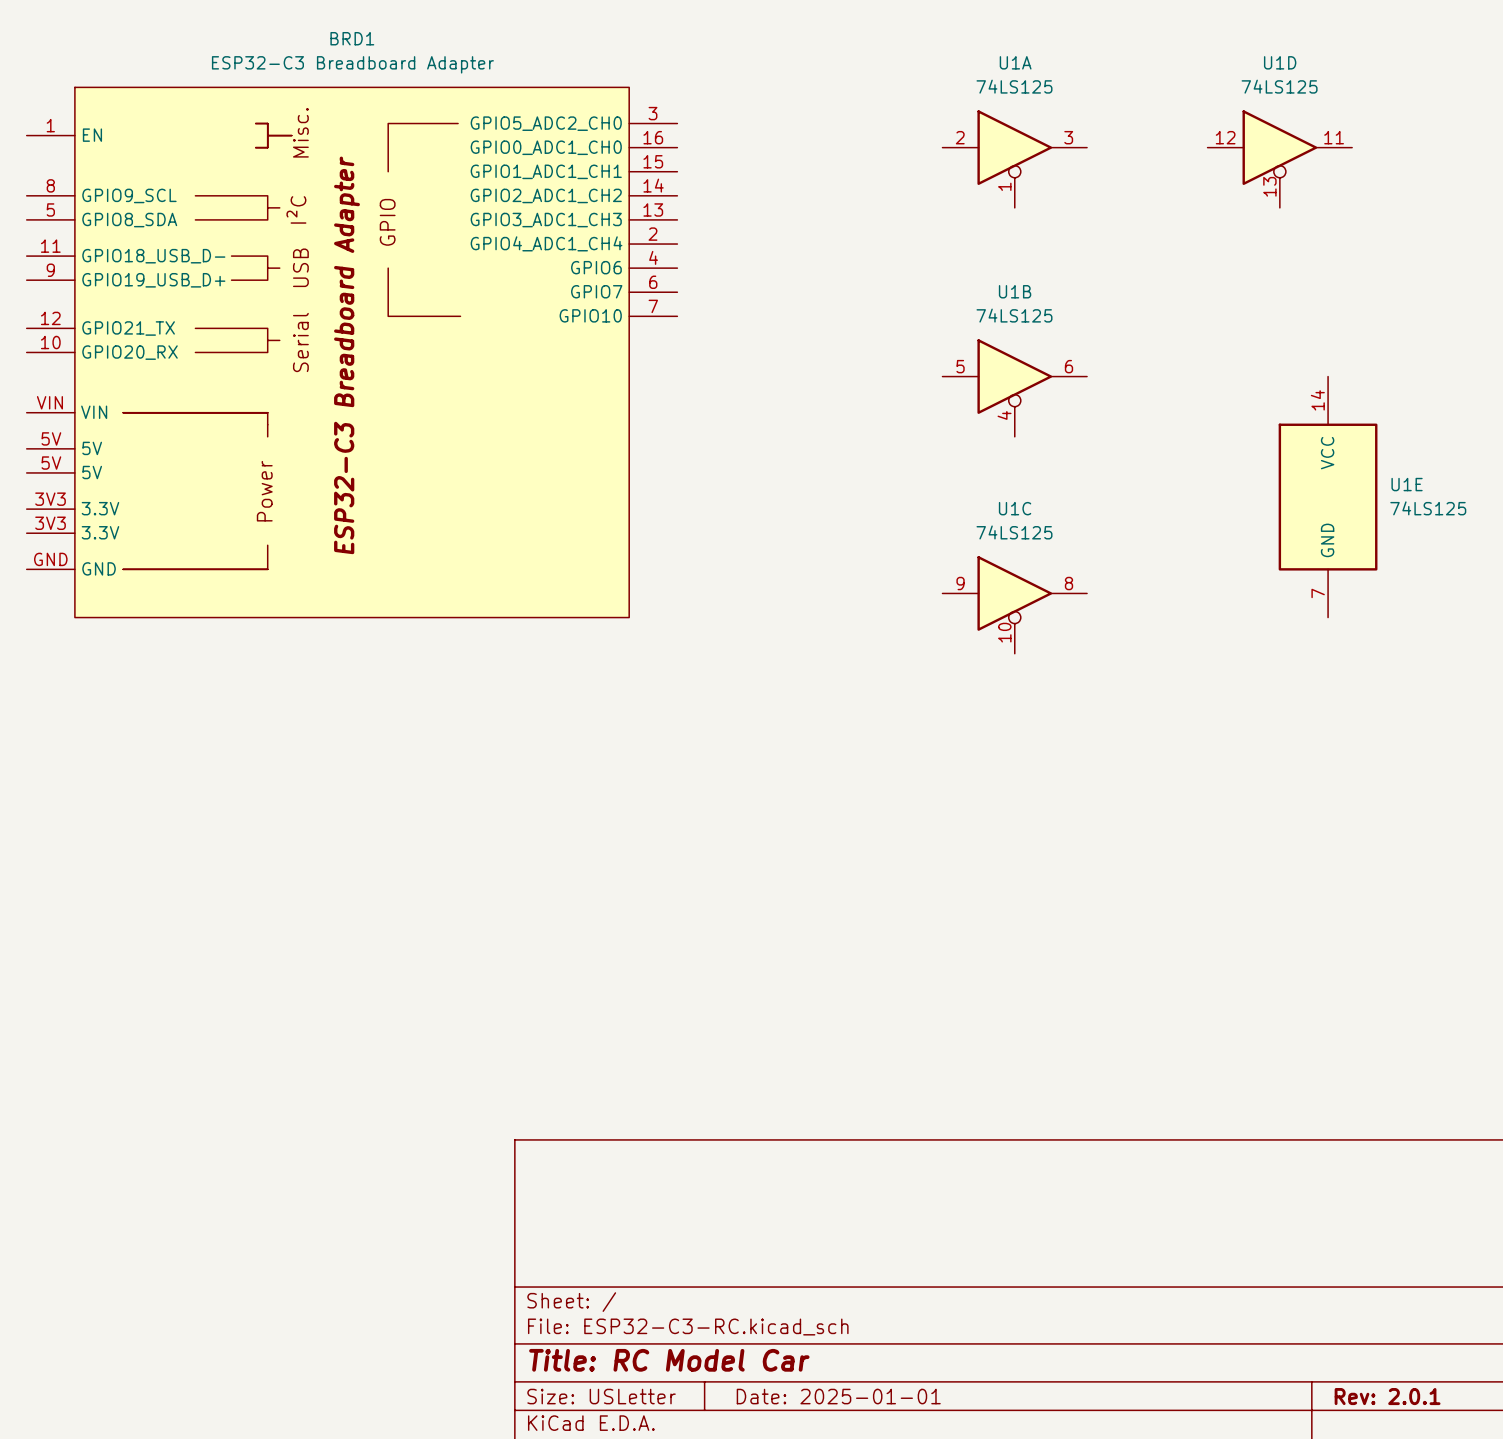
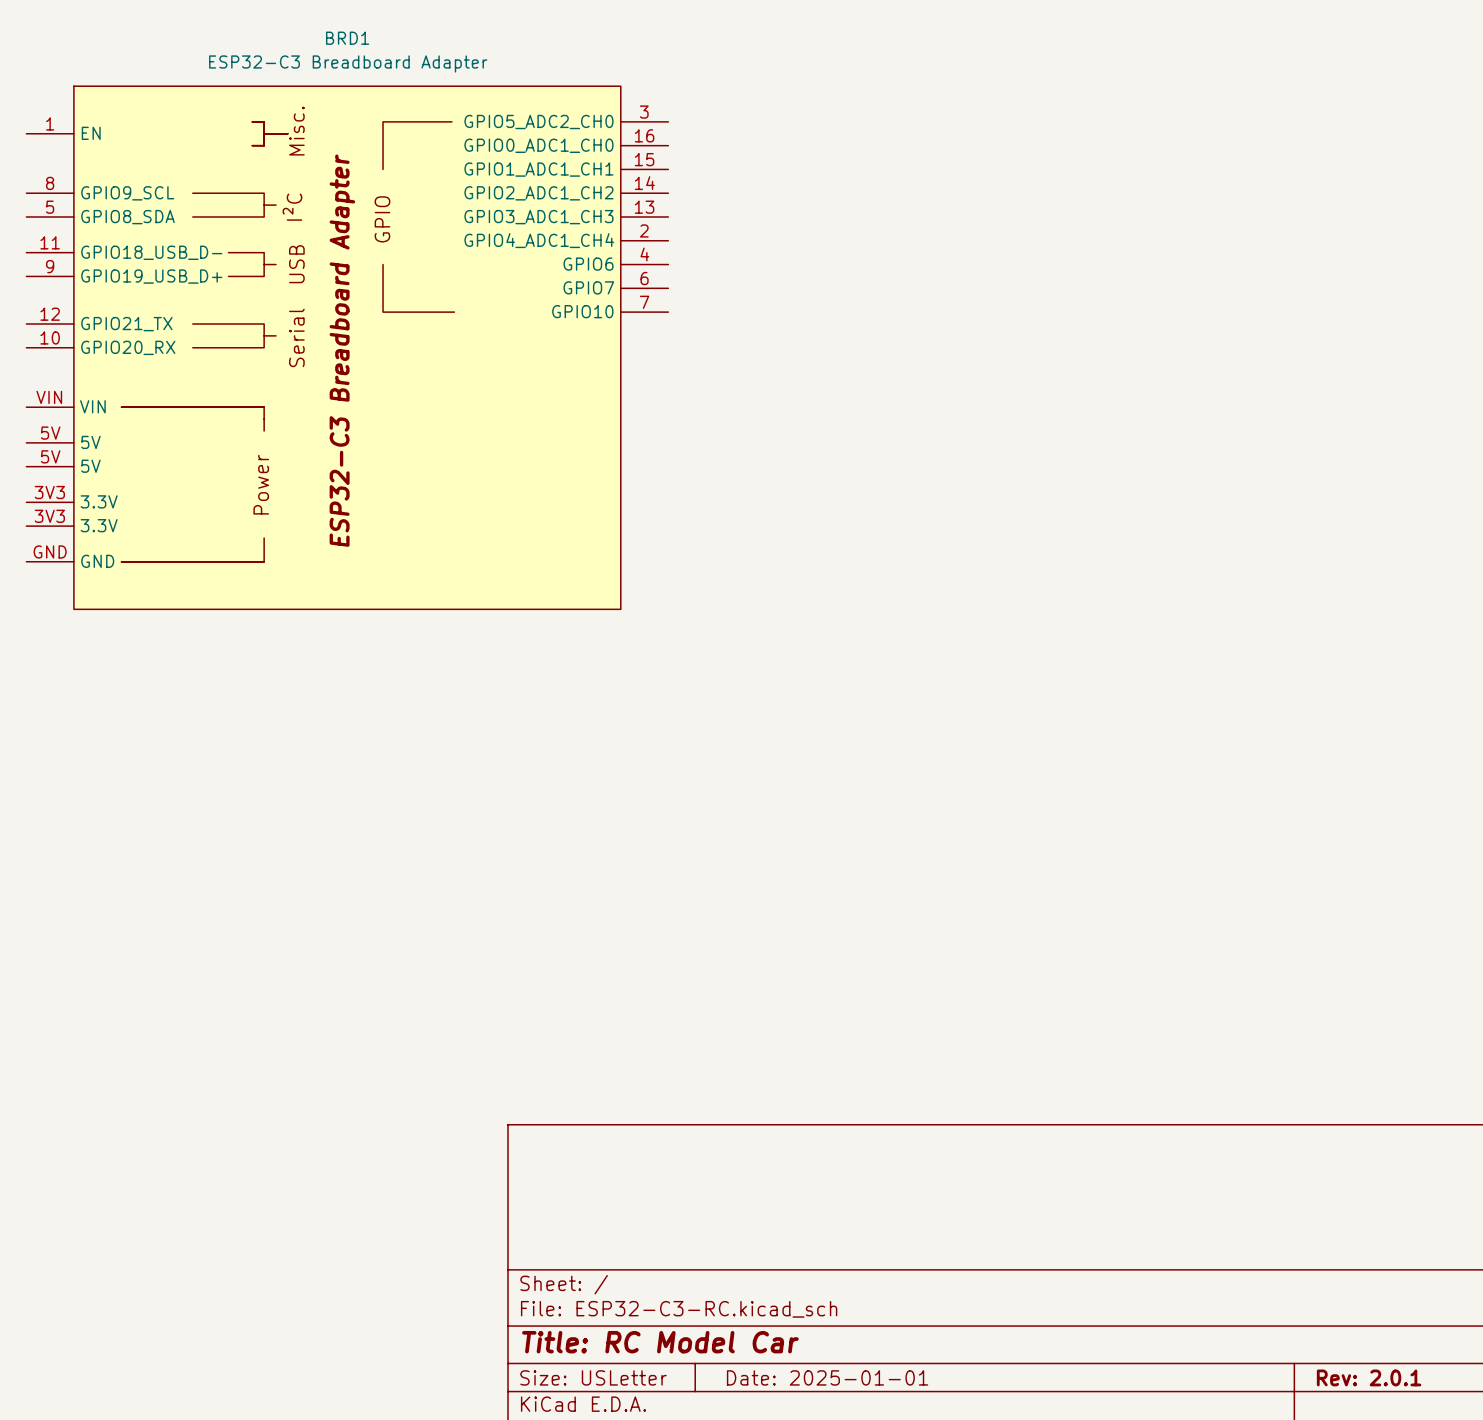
U1A: 74LS125 (1014, 159) -> none
U1D: 74LS125 (1279, 159) -> none
U1B: 74LS125 (1014, 388) -> none
U1E: 74LS125 (1328, 497) -> none
U1C: 74LS125 (1014, 604) -> none

